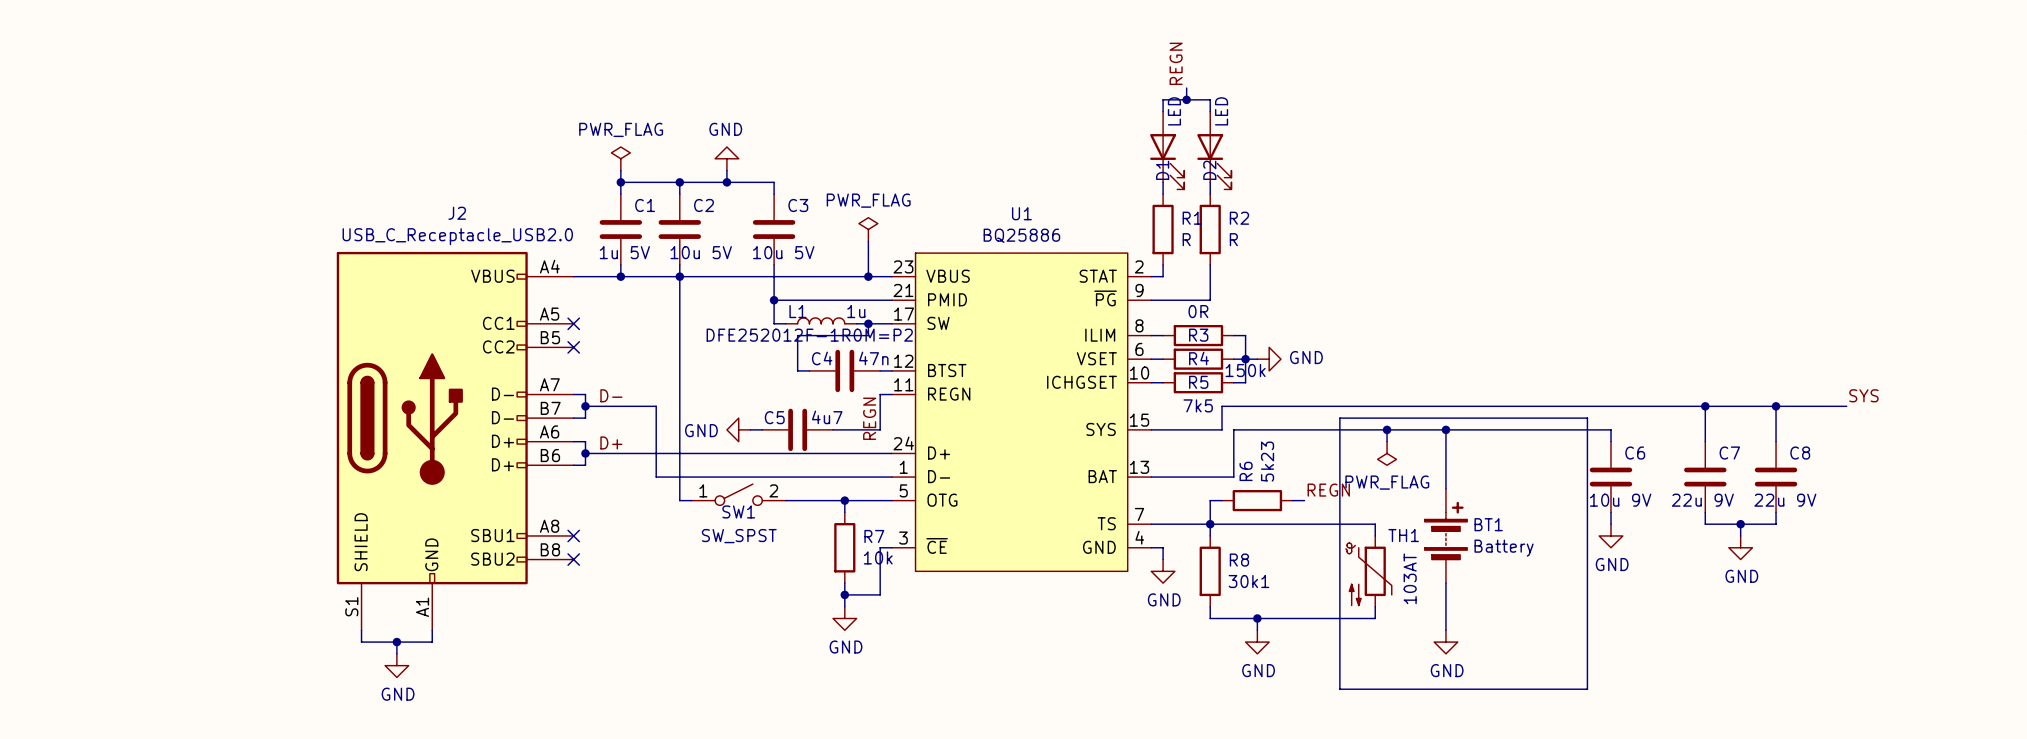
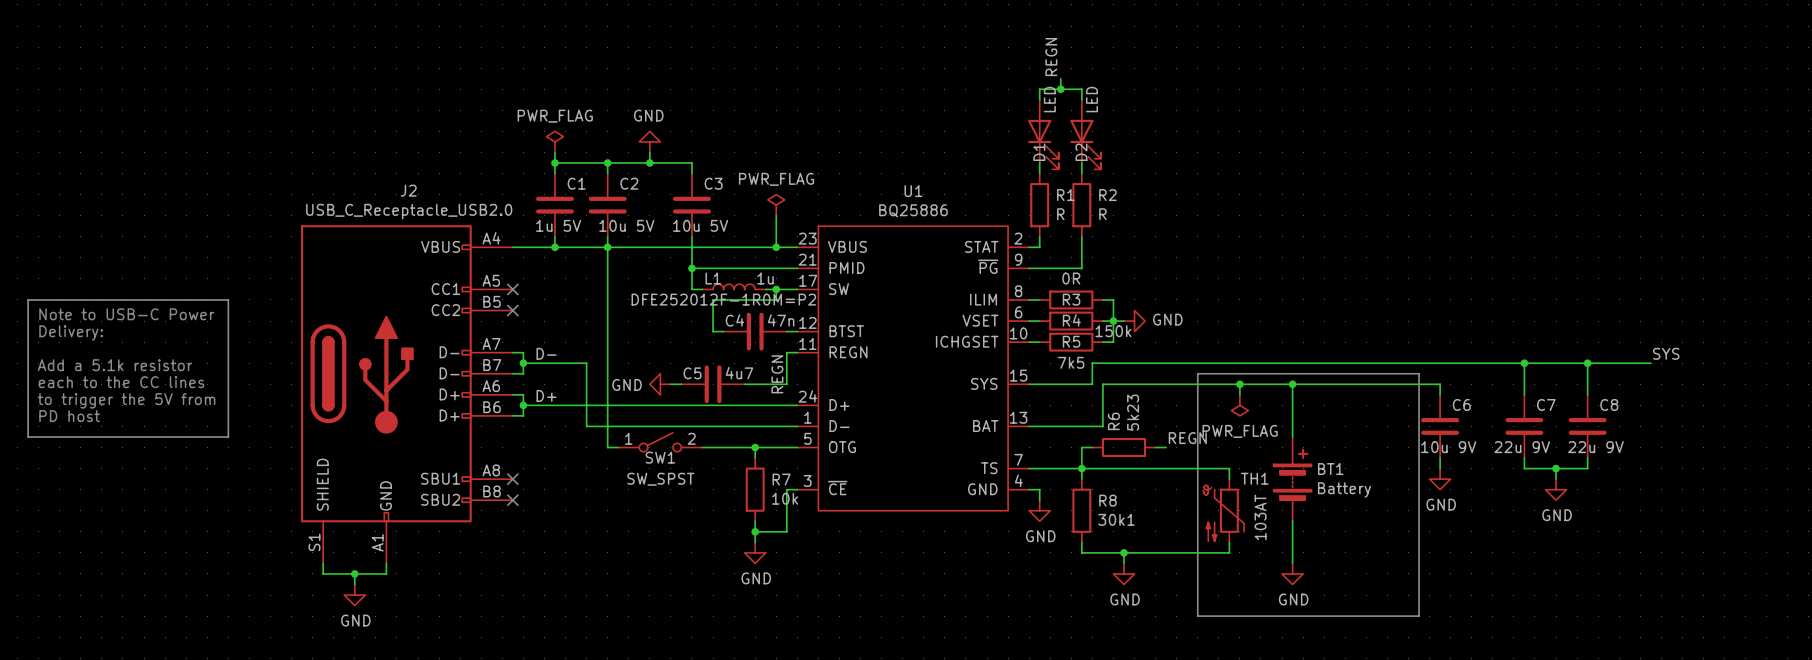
line: none -> (28, 299) (228, 299) (228, 436) (28, 436) (28, 299)
text: none -> Note to USB-C Power (126, 314)
text: none -> Delivery: (71, 333)
text: none -> Add a 5.1k resistor (115, 365)
text: none -> each to the CC lines (121, 382)
text: none -> to trigger the 5V from (126, 400)
text: none -> PD host (69, 416)

